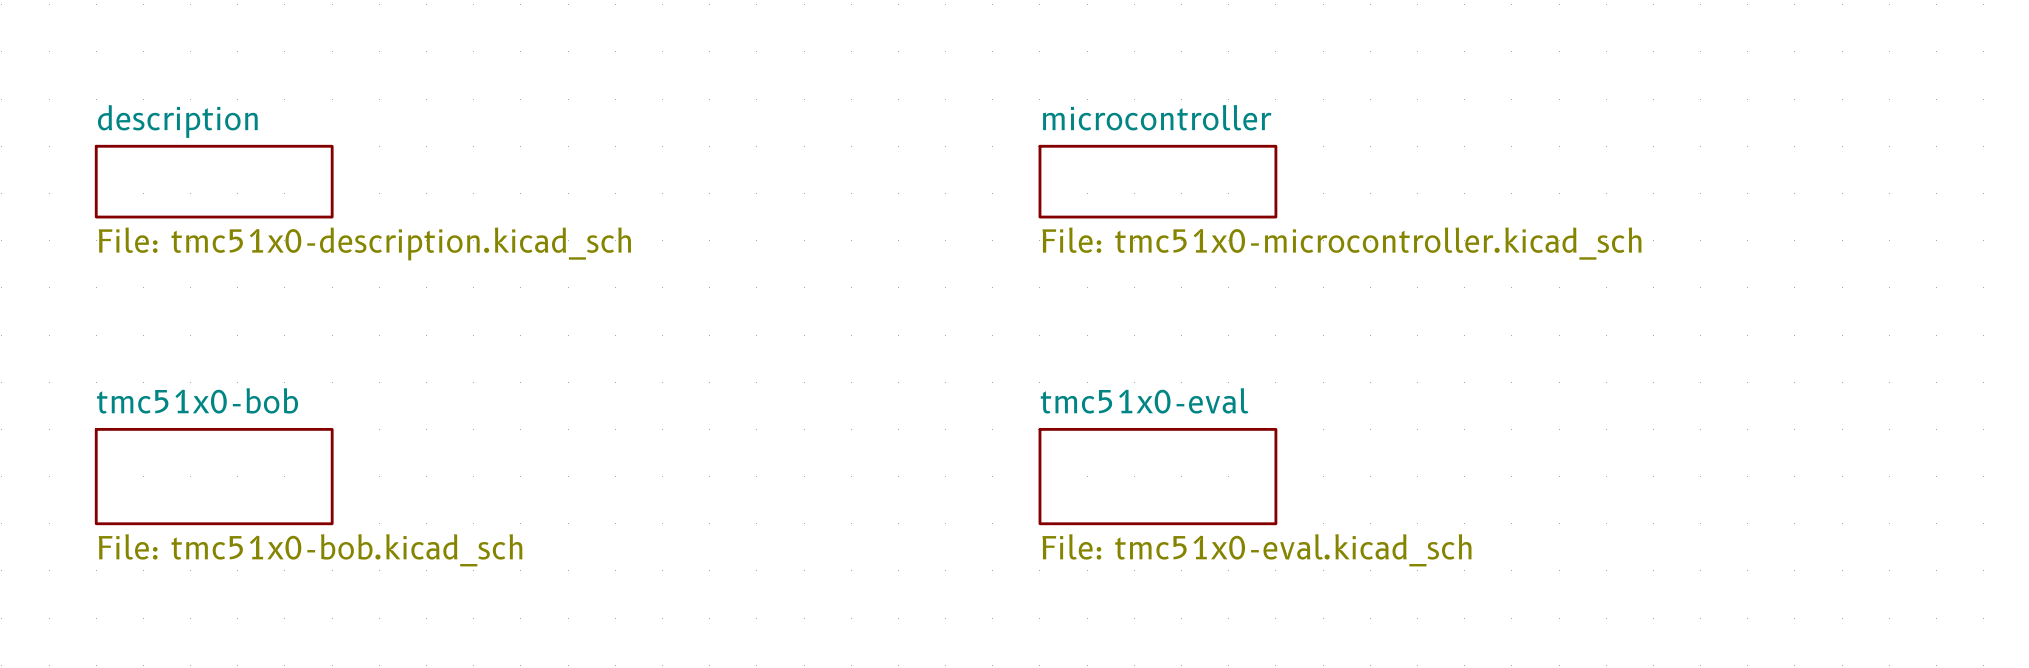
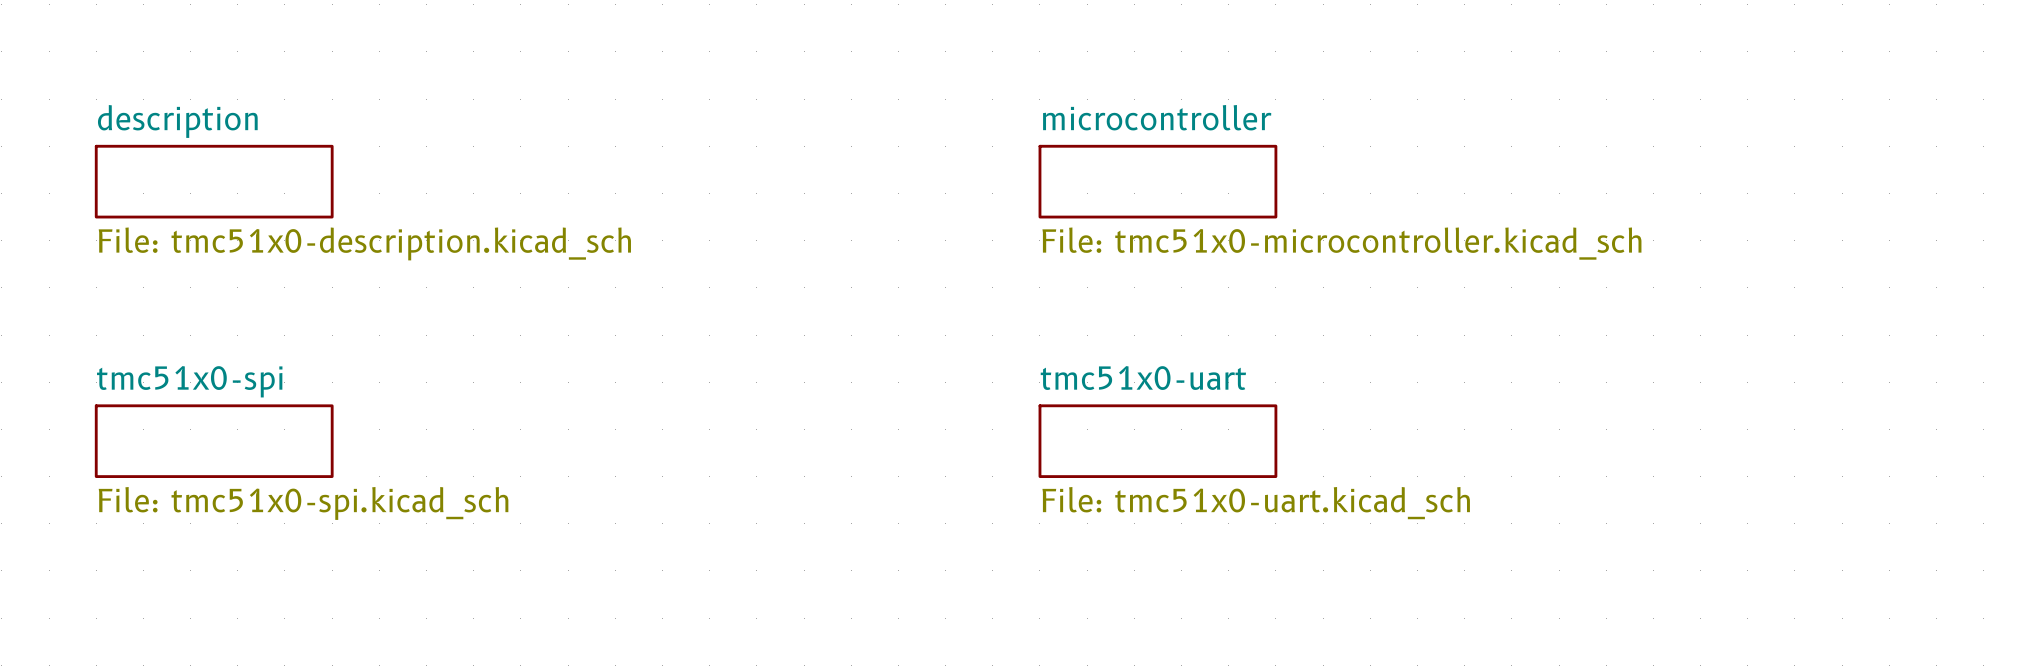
sheet tmc51x0-spi: none -> File: tmc51x0-spi.kicad_sch (214, 441)
sheet tmc51x0-uart: none -> File: tmc51x0-uart.kicad_sch (1157, 441)
sheet tmc51x0-bob: File: tmc51x0-bob.kicad_sch (214, 476) -> none
sheet tmc51x0-eval: File: tmc51x0-eval.kicad_sch (1157, 476) -> none

